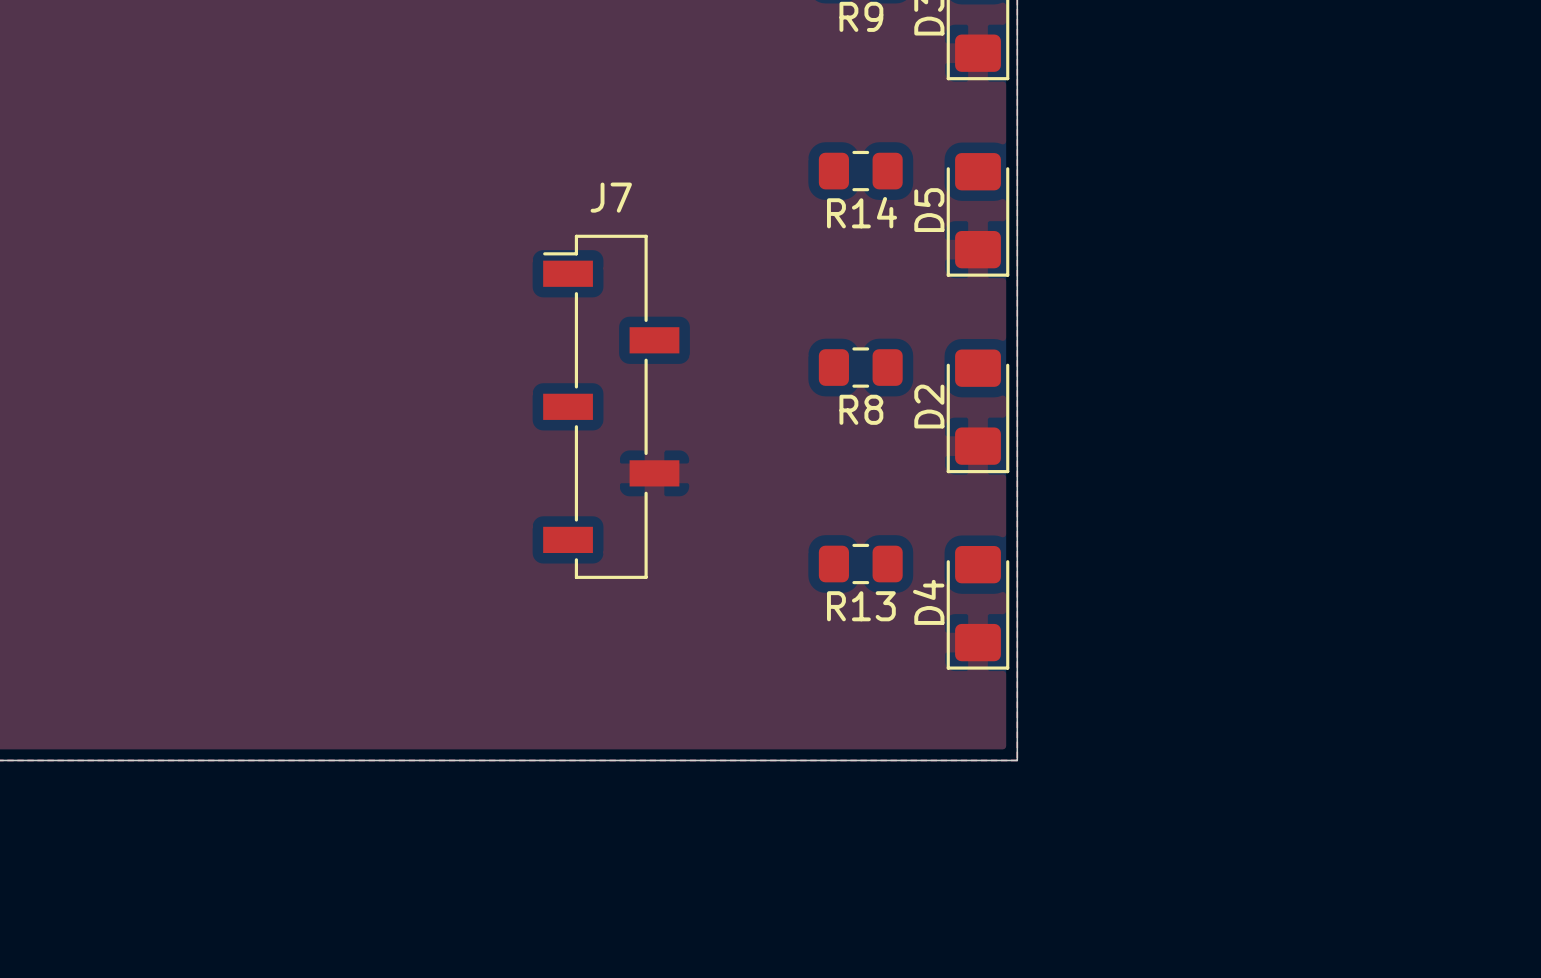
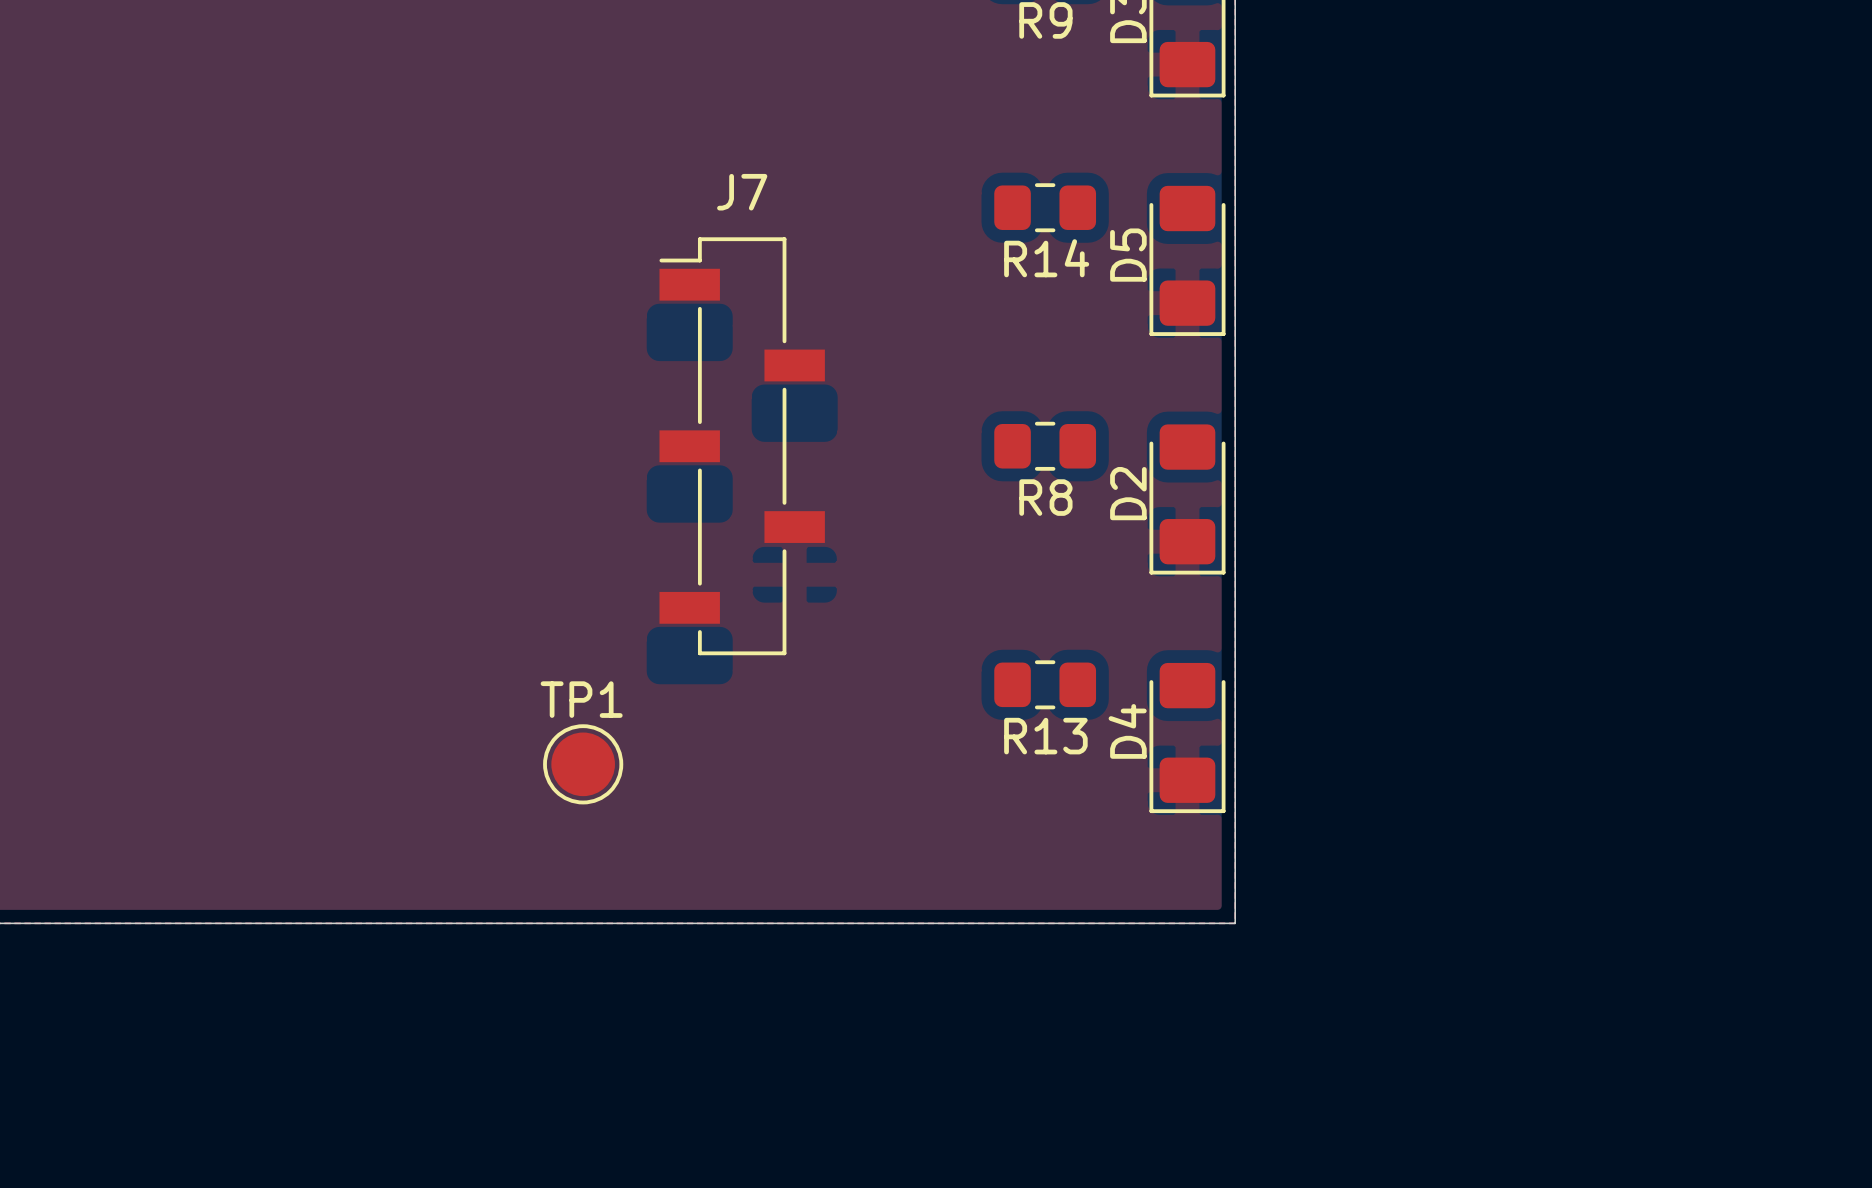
J7 position: (611, 406) -> (742, 446)
TP1: none -> (583, 764)

